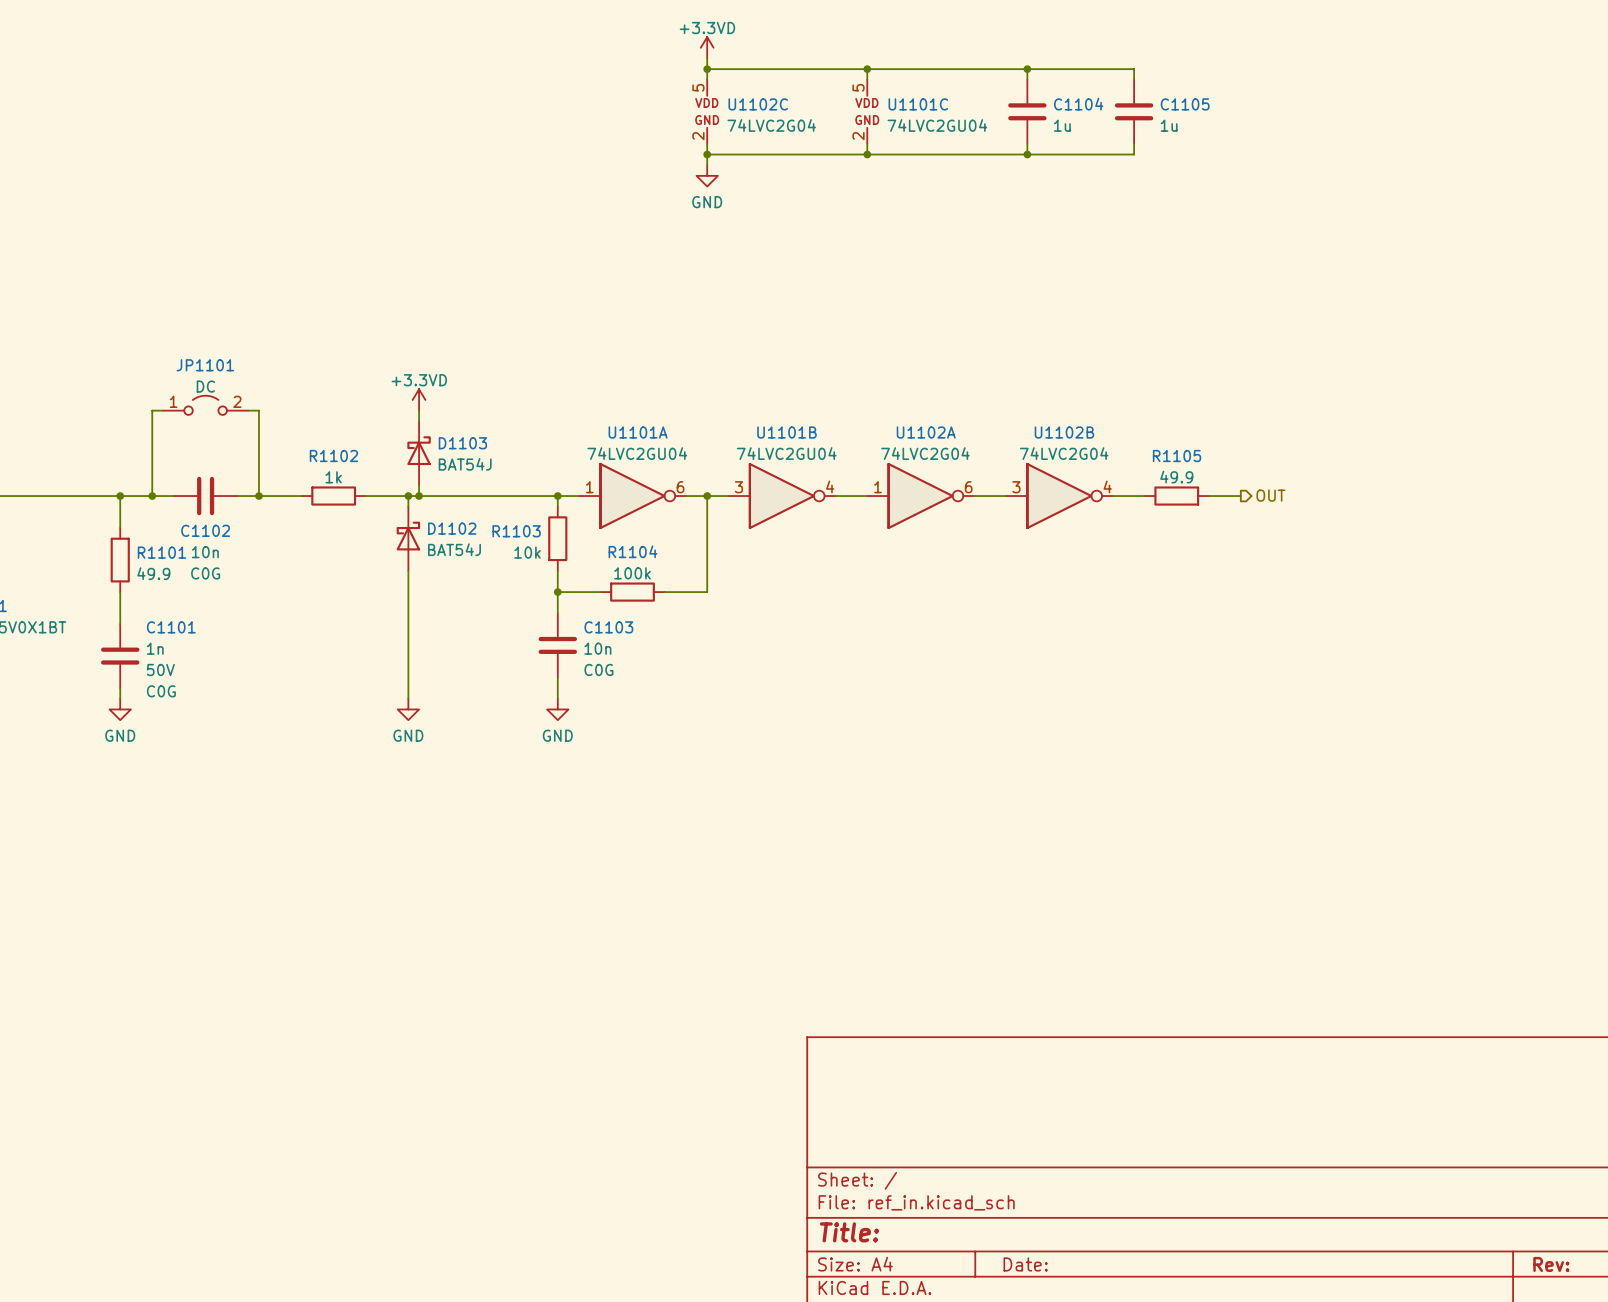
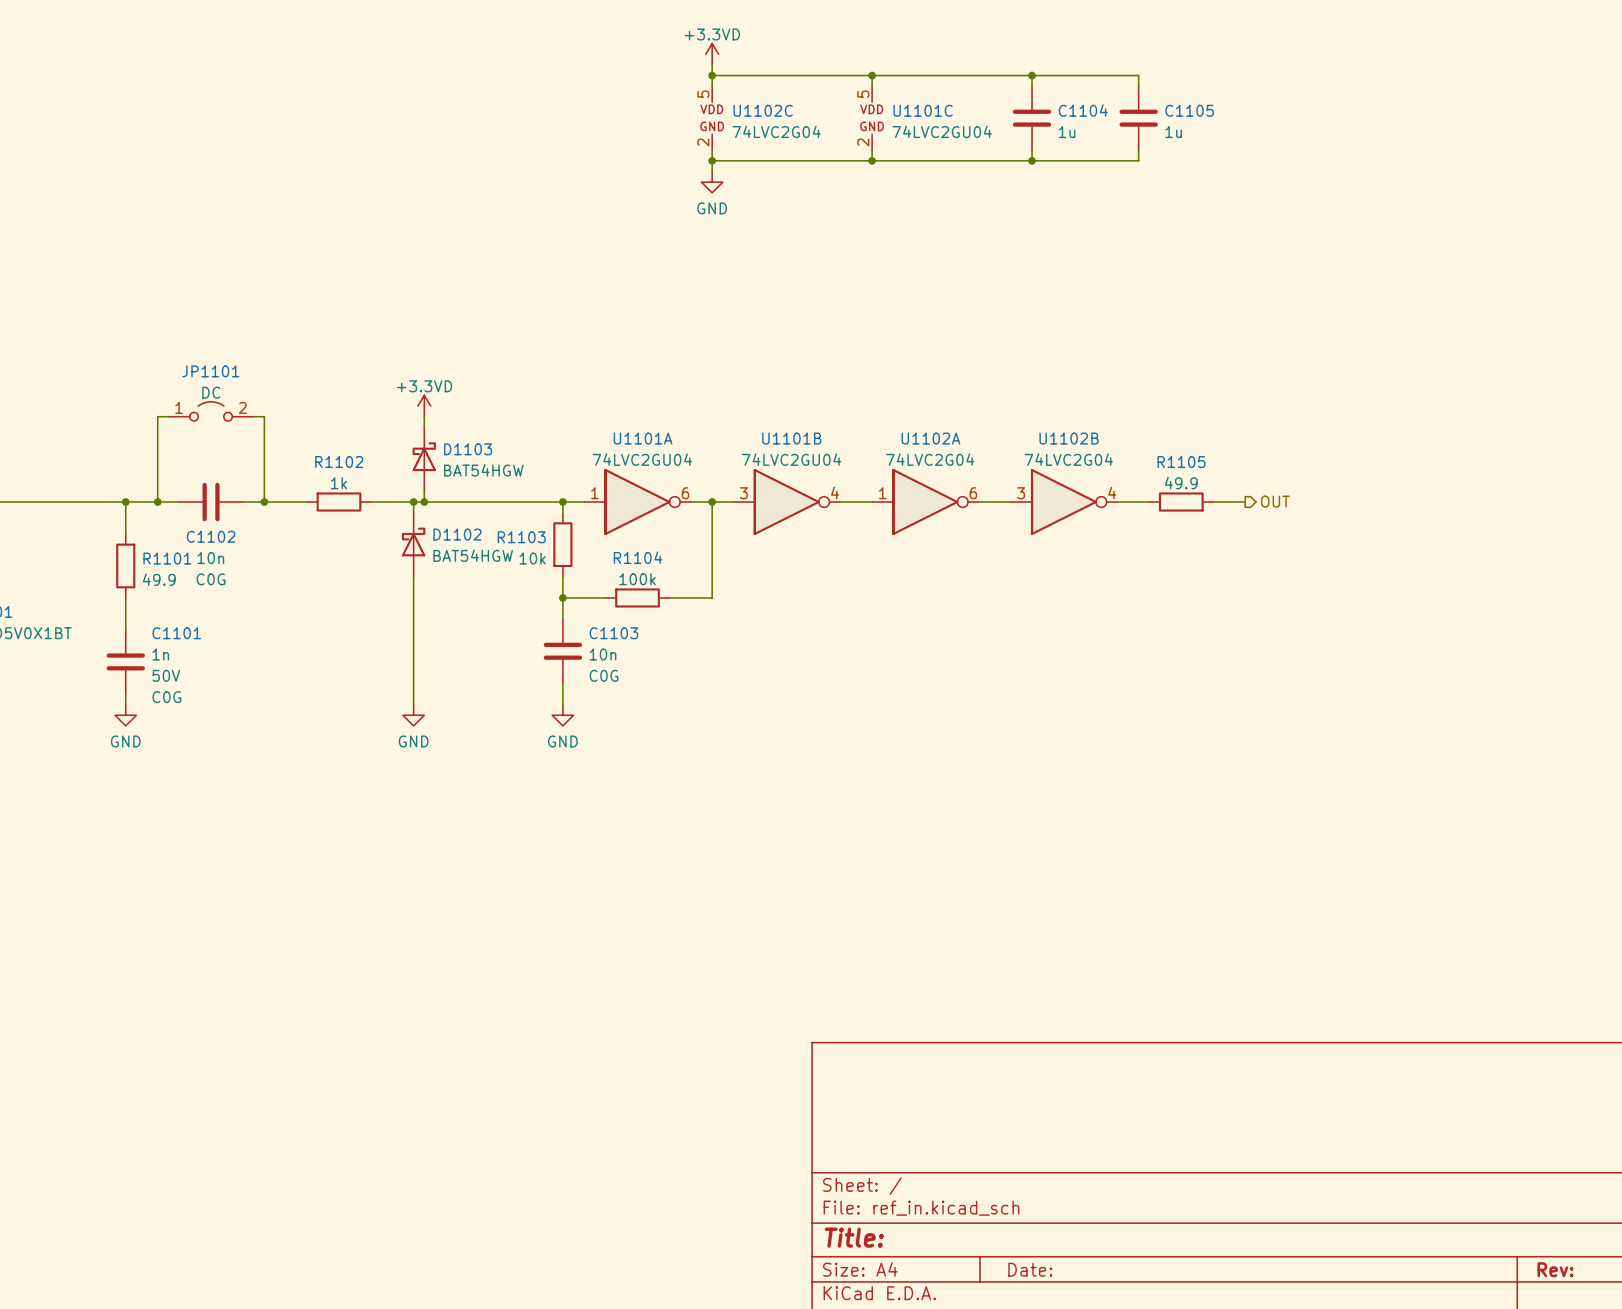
D1103 value: BAT54J (465, 464) -> BAT54HGW (483, 470)
D1102 value: BAT54J (454, 549) -> BAT54HGW (473, 555)

